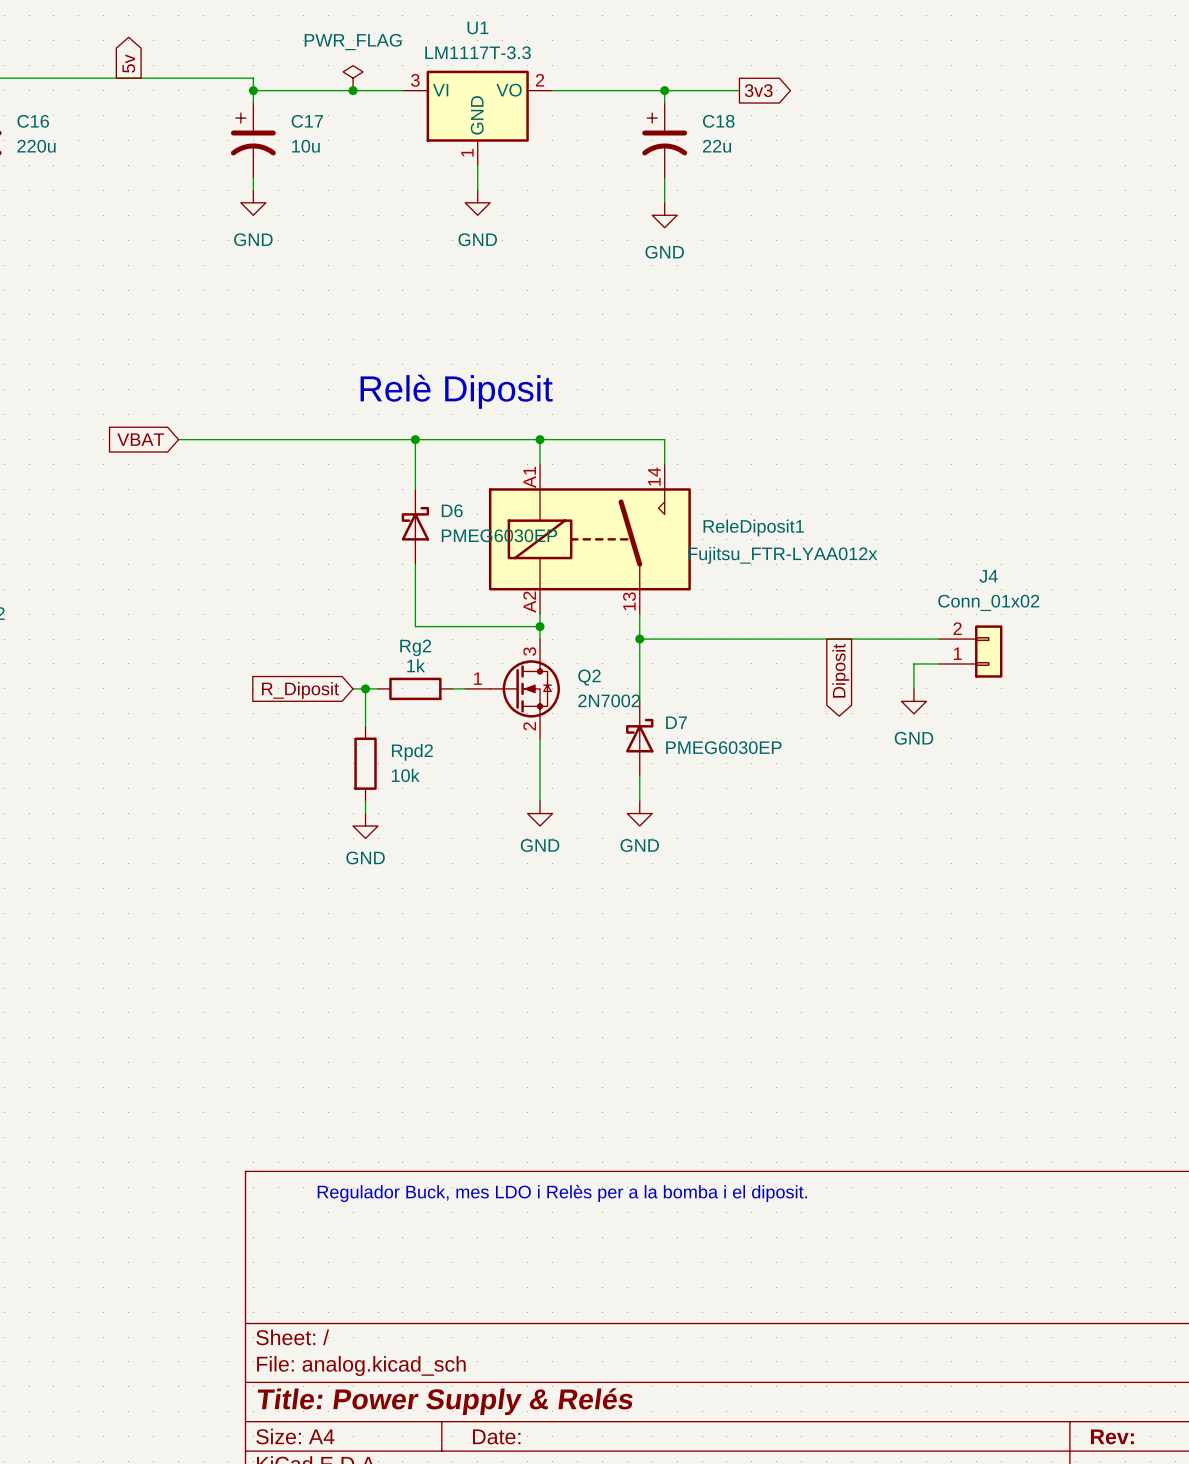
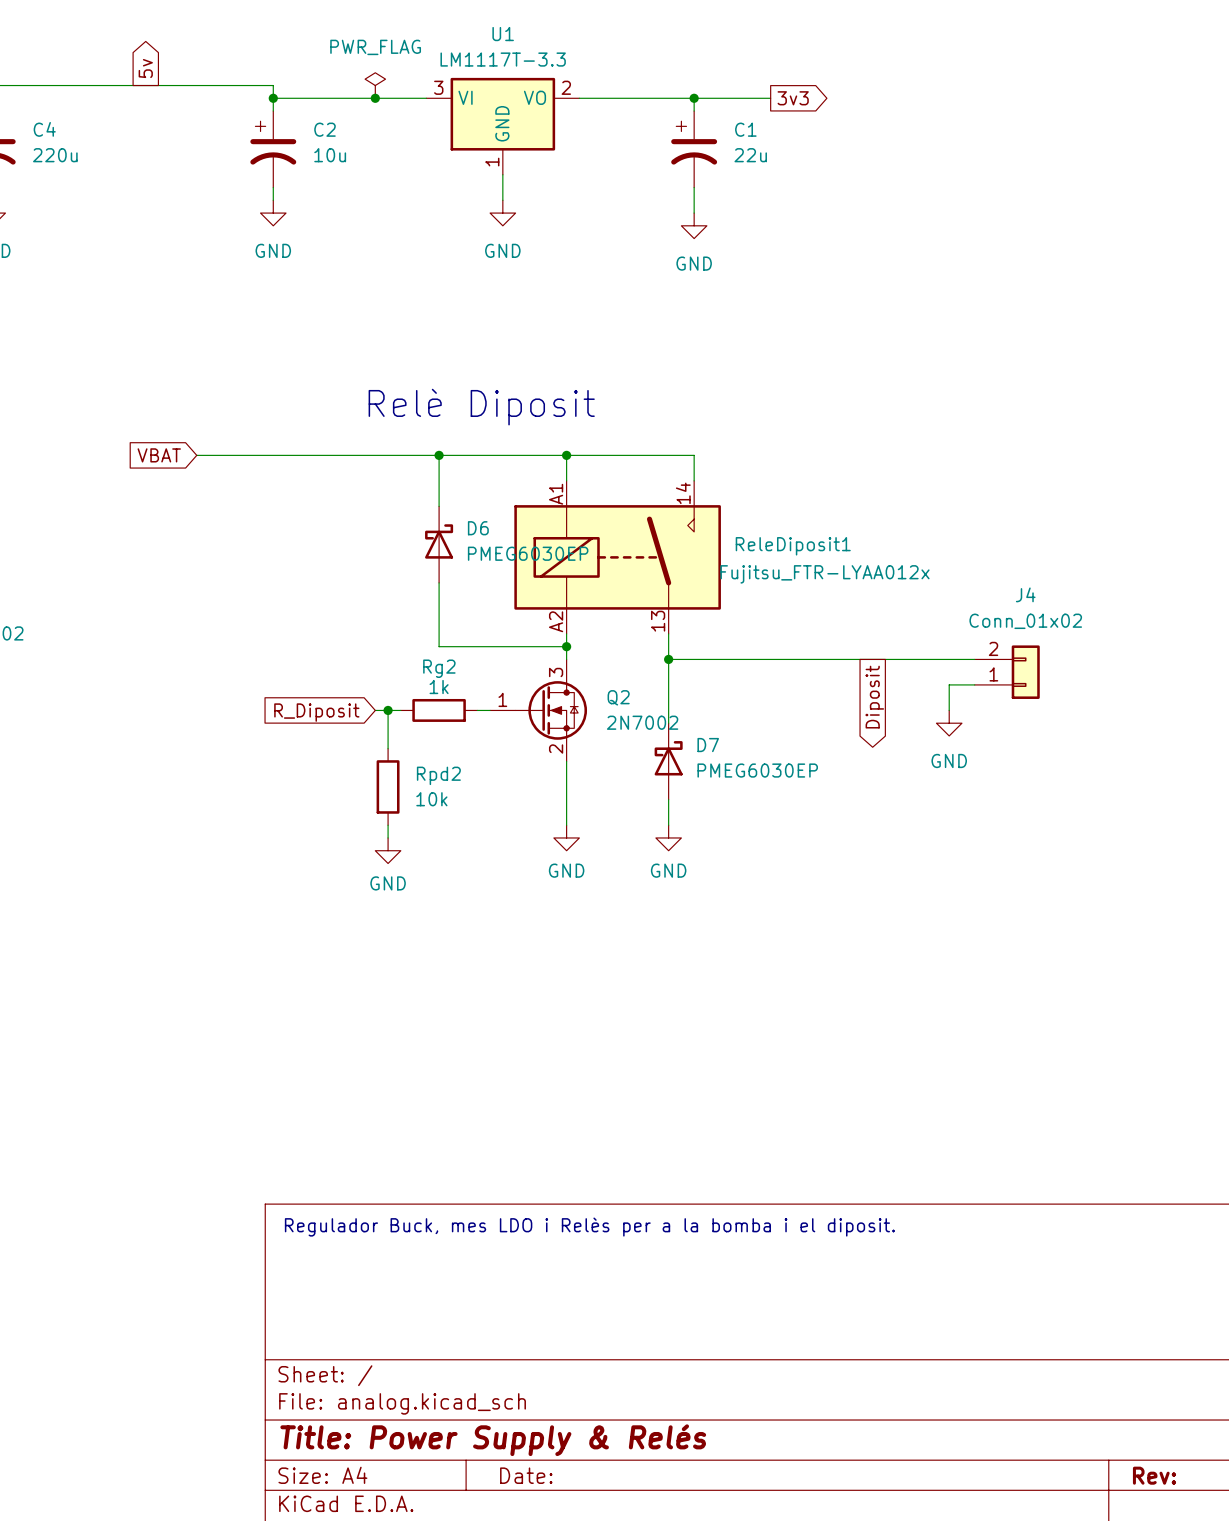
C16 name: C16 (33, 121) -> C4 (44, 129)
C17 name: C17 (307, 121) -> C2 (325, 129)
C18 name: C18 (718, 121) -> C1 (745, 129)

